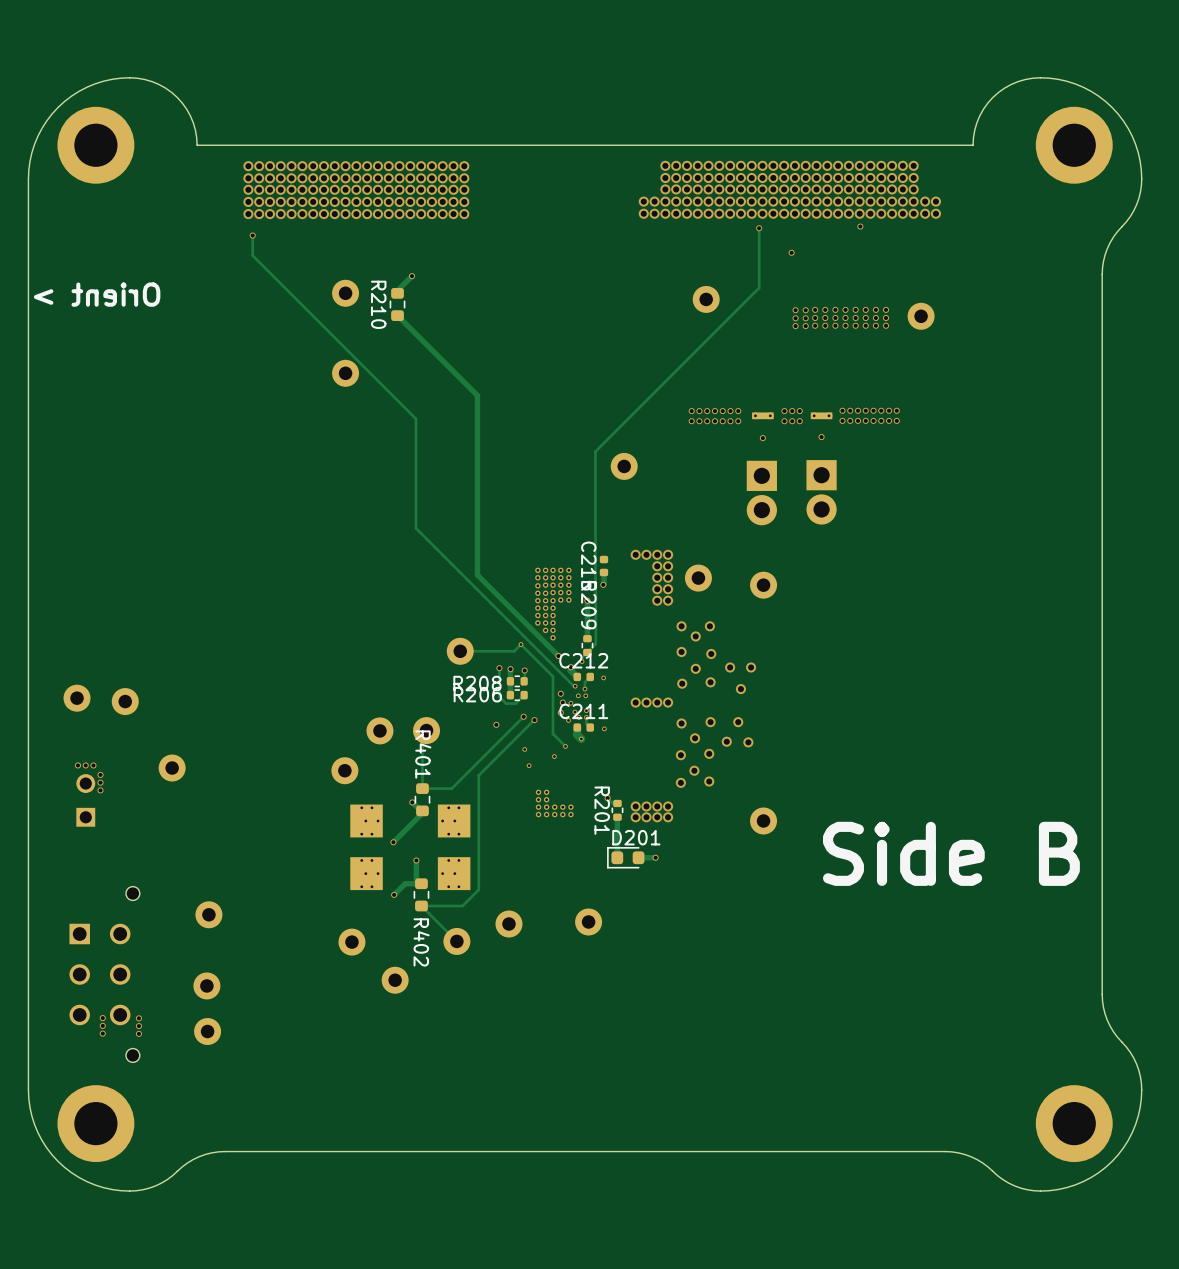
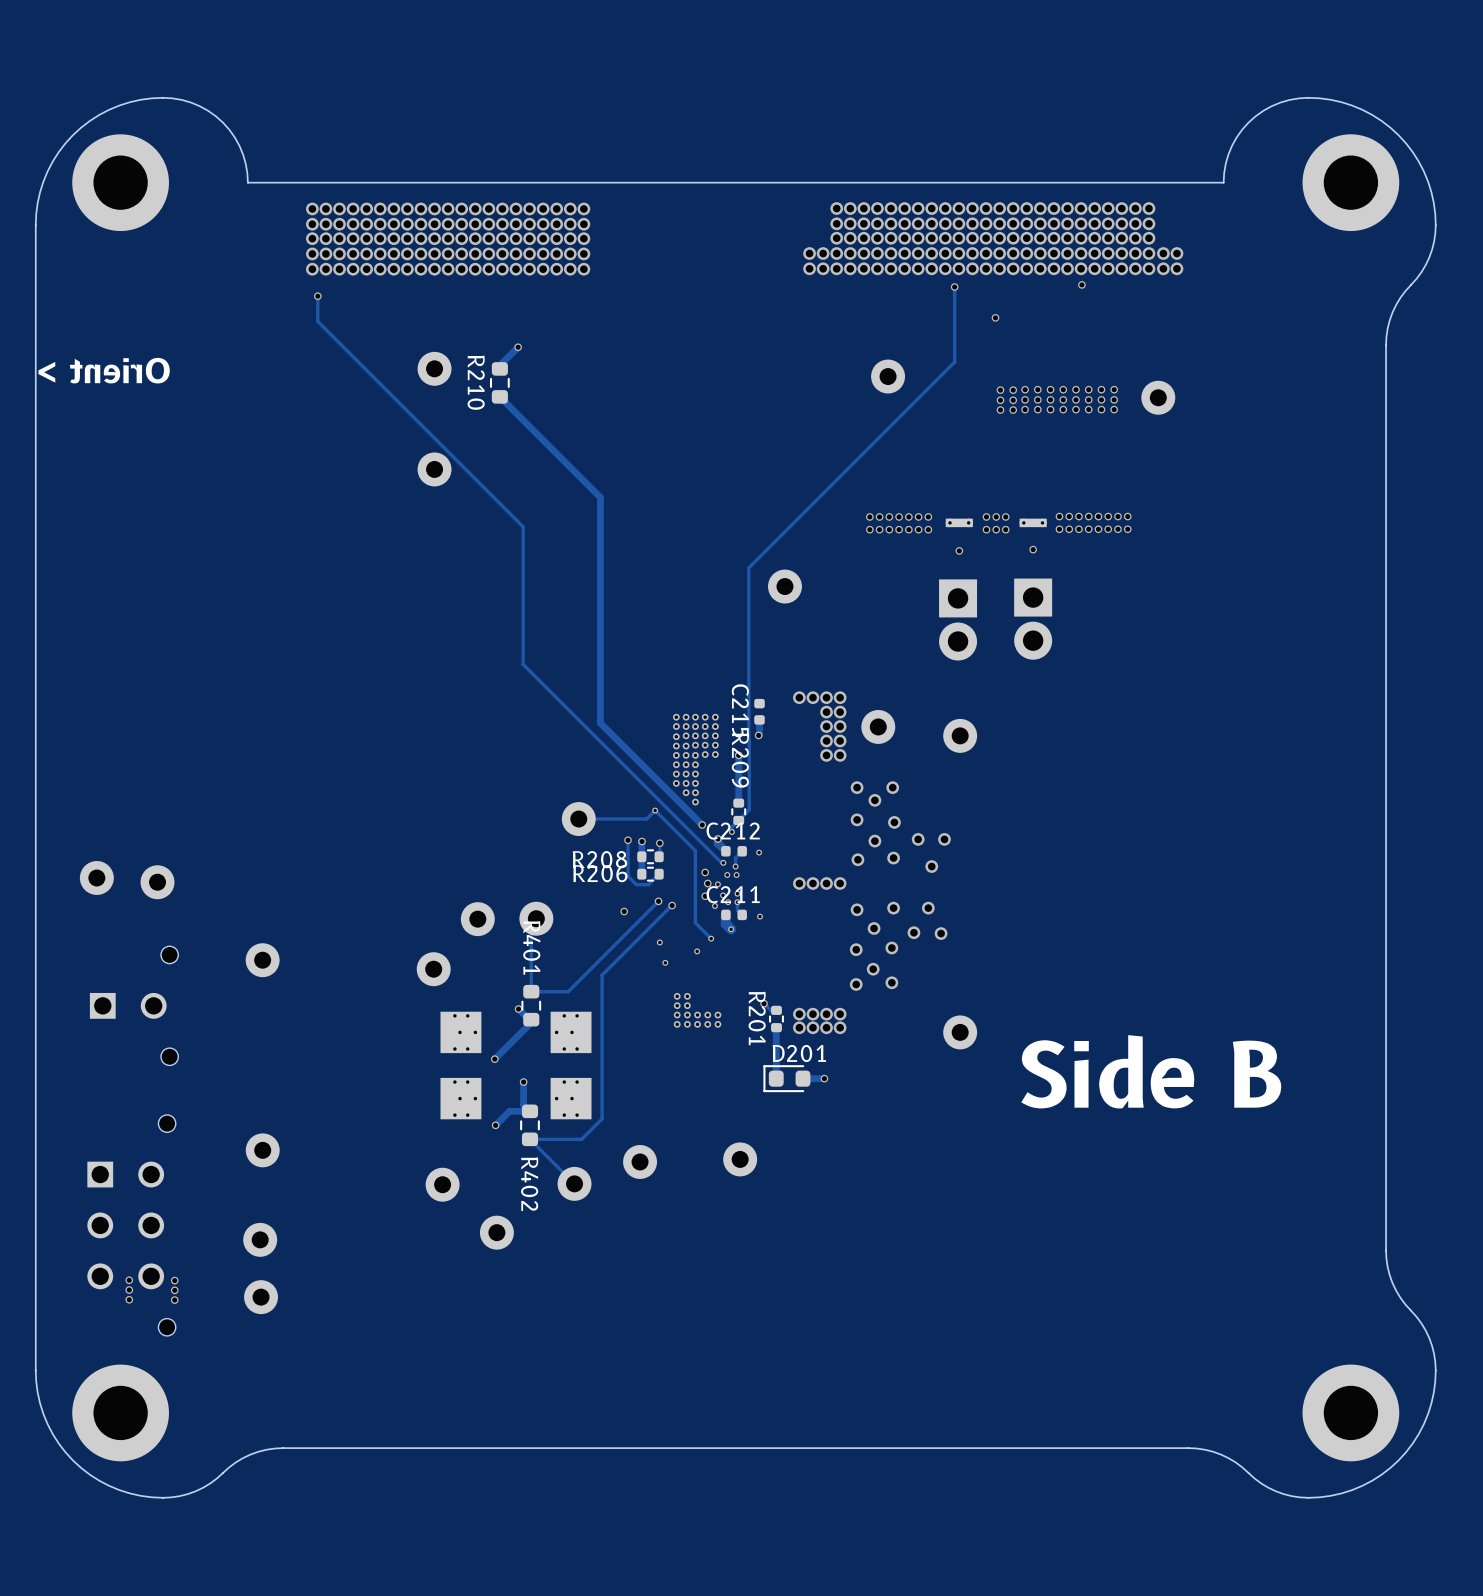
via: (77, 765) -> none
via: (85, 765) -> none
via: (93, 765) -> none
part position: (172, 768) -> (262, 960)
via: (100, 774) -> none
via: (100, 782) -> none
via: (100, 790) -> none
part: none -> (134, 1005)
part: (85, 800) -> none

